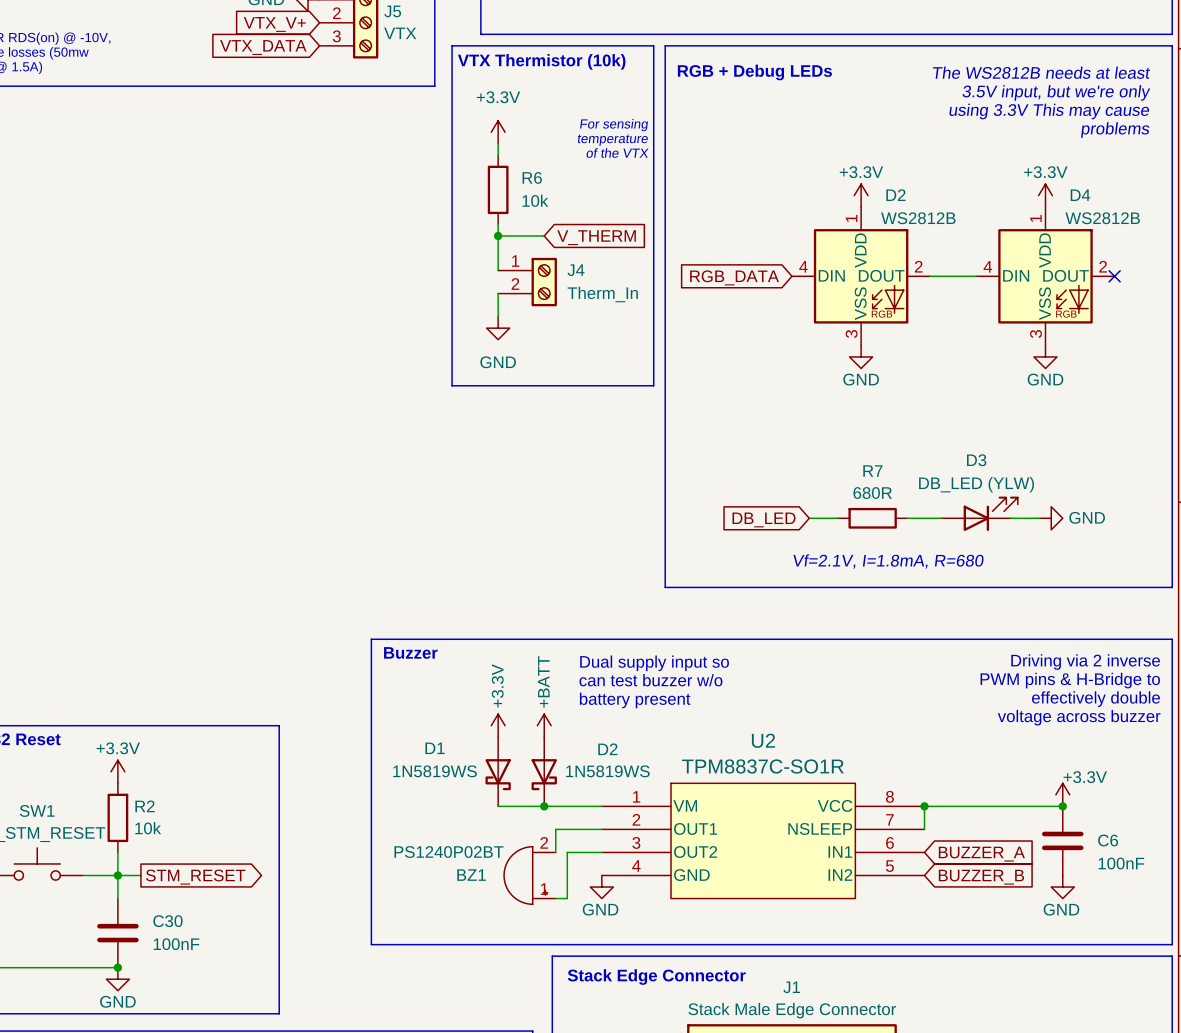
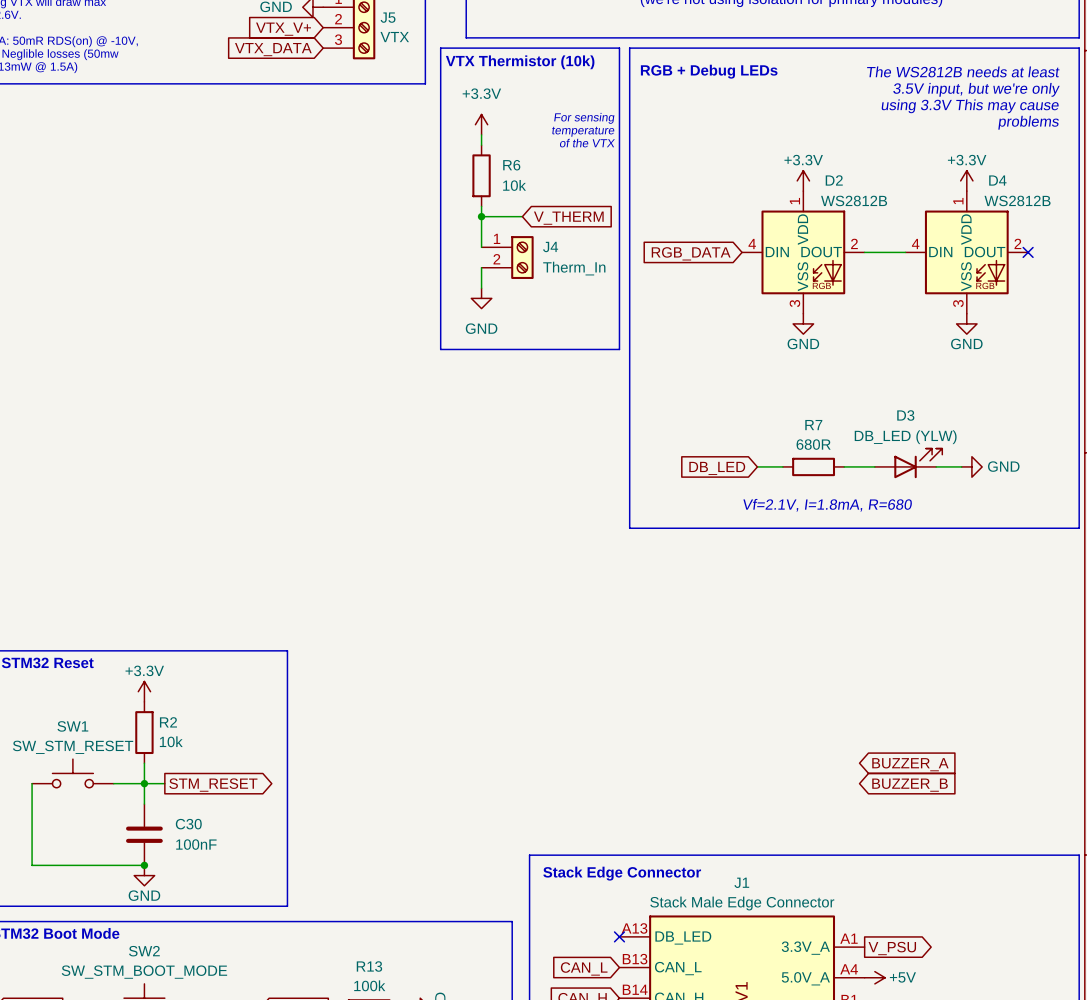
line: (371, 639) (1172, 639) (1172, 944) (371, 944) (371, 639) -> none
text: Buzzer (410, 652) -> none
text: Driving via 2 inverse (1085, 662) -> none
text: Dual supply input so (654, 663) -> none
text: can test buzzer w/o (650, 680) -> none
text: PWM pins & H-Bridge to (1070, 680) -> none
text: effectively double (1095, 699) -> none
text: battery present (635, 700) -> none
text: voltage across buzzer (1079, 717) -> none
power symbol: +3.3V (498, 725) -> none
power symbol: +BATT (544, 725) -> none
D1: 1N5819WS (498, 771) -> none
D2: 1N5819WS (544, 771) -> none
power symbol: +3.3V (1062, 794) -> none
wire: (498, 806) (601, 806) -> none
junction: (544, 806) -> none
junction: (924, 806) -> none
wire: (1062, 806) (924, 806) (924, 829) -> none
junction: (1062, 806) -> none
wire: (601, 829) (555, 829) (555, 852) -> none
U2: TPM8837C-SO1R (763, 840) -> none
C6: 100nF (1062, 840) -> none
wire: (601, 852) (567, 852) (567, 898) (555, 898) -> none
BZ1: PS1240P02BT (529, 875) -> none
power symbol: GND (601, 887) -> none
power symbol: GND (1062, 887) -> none

